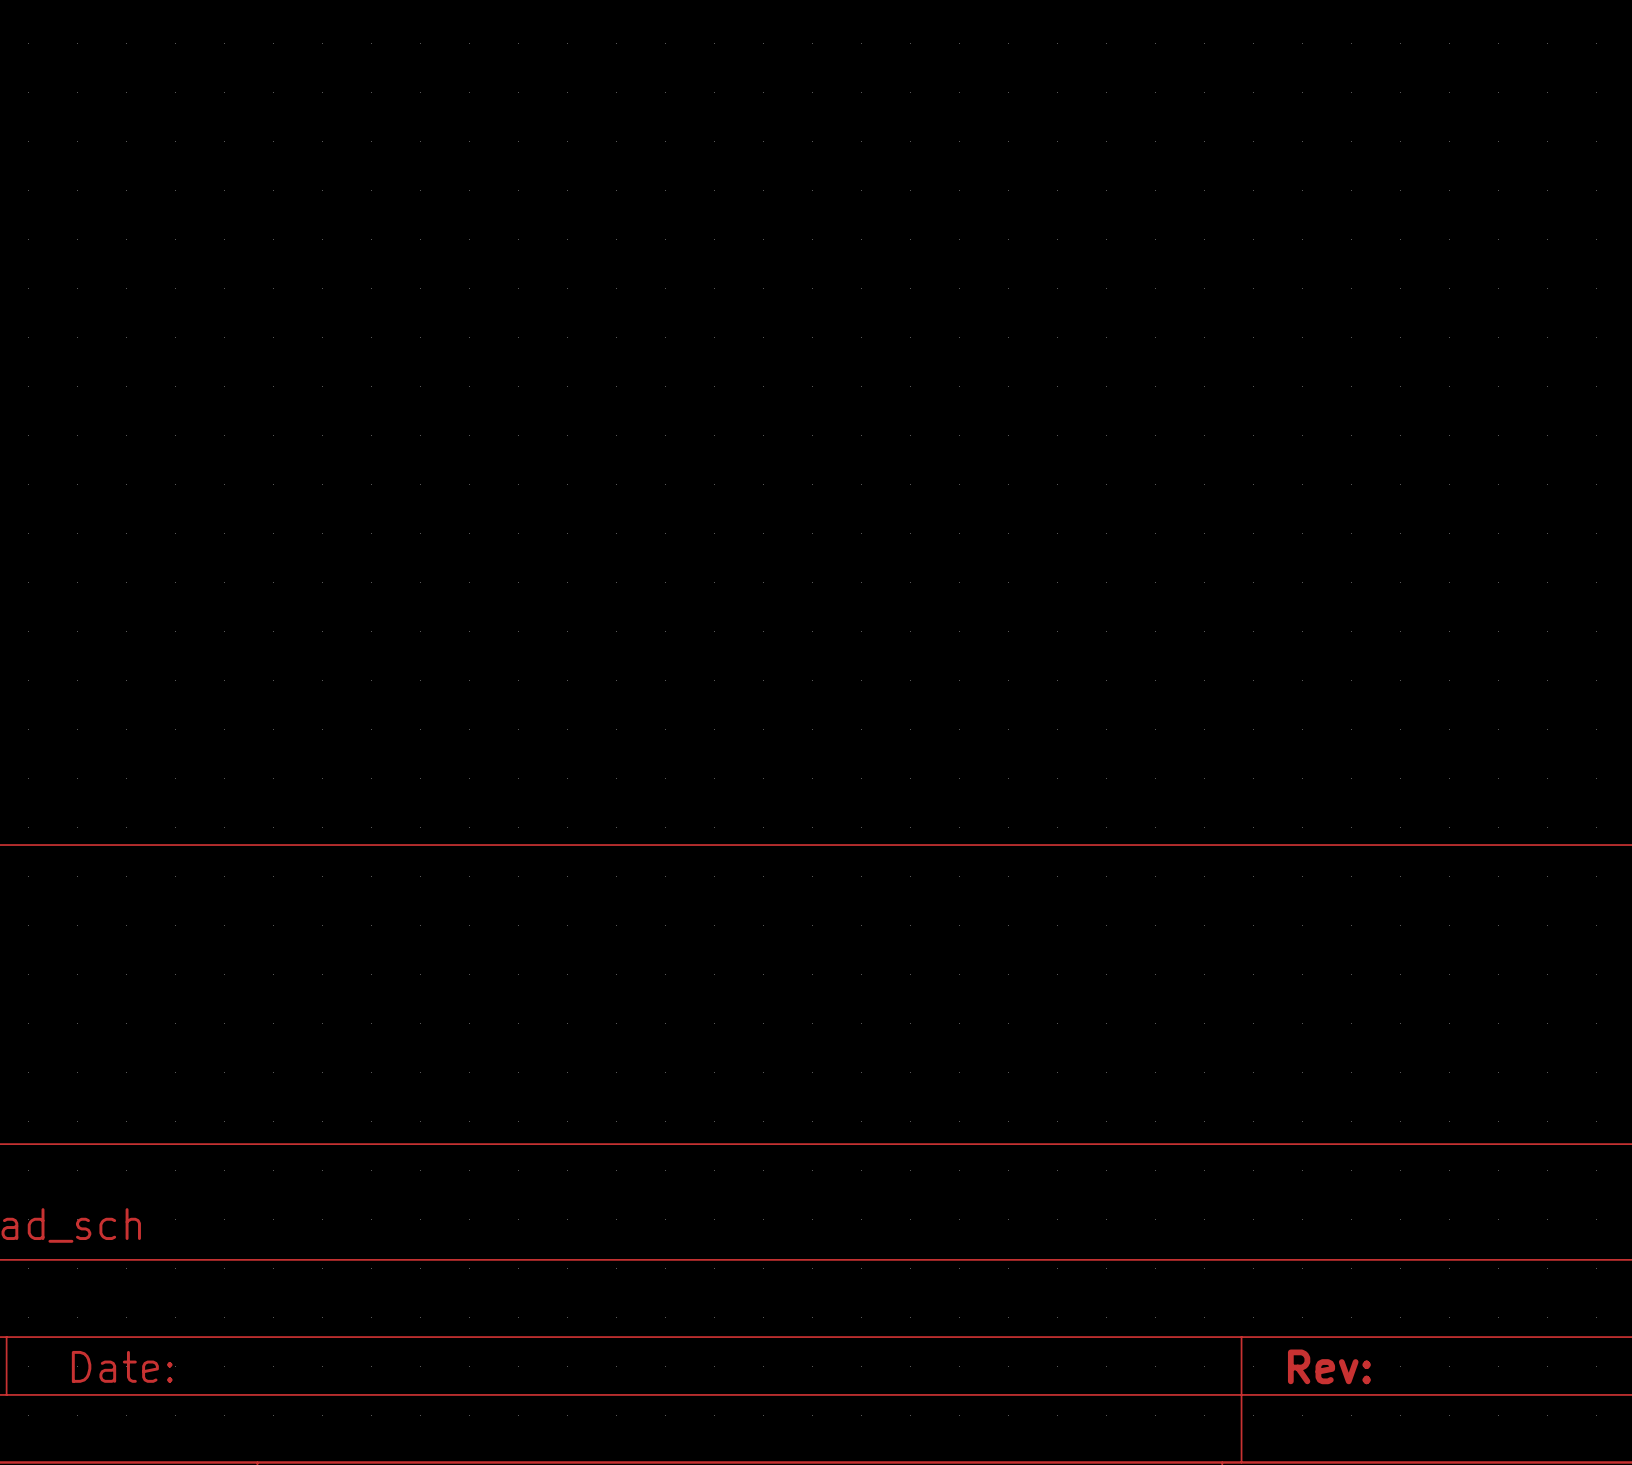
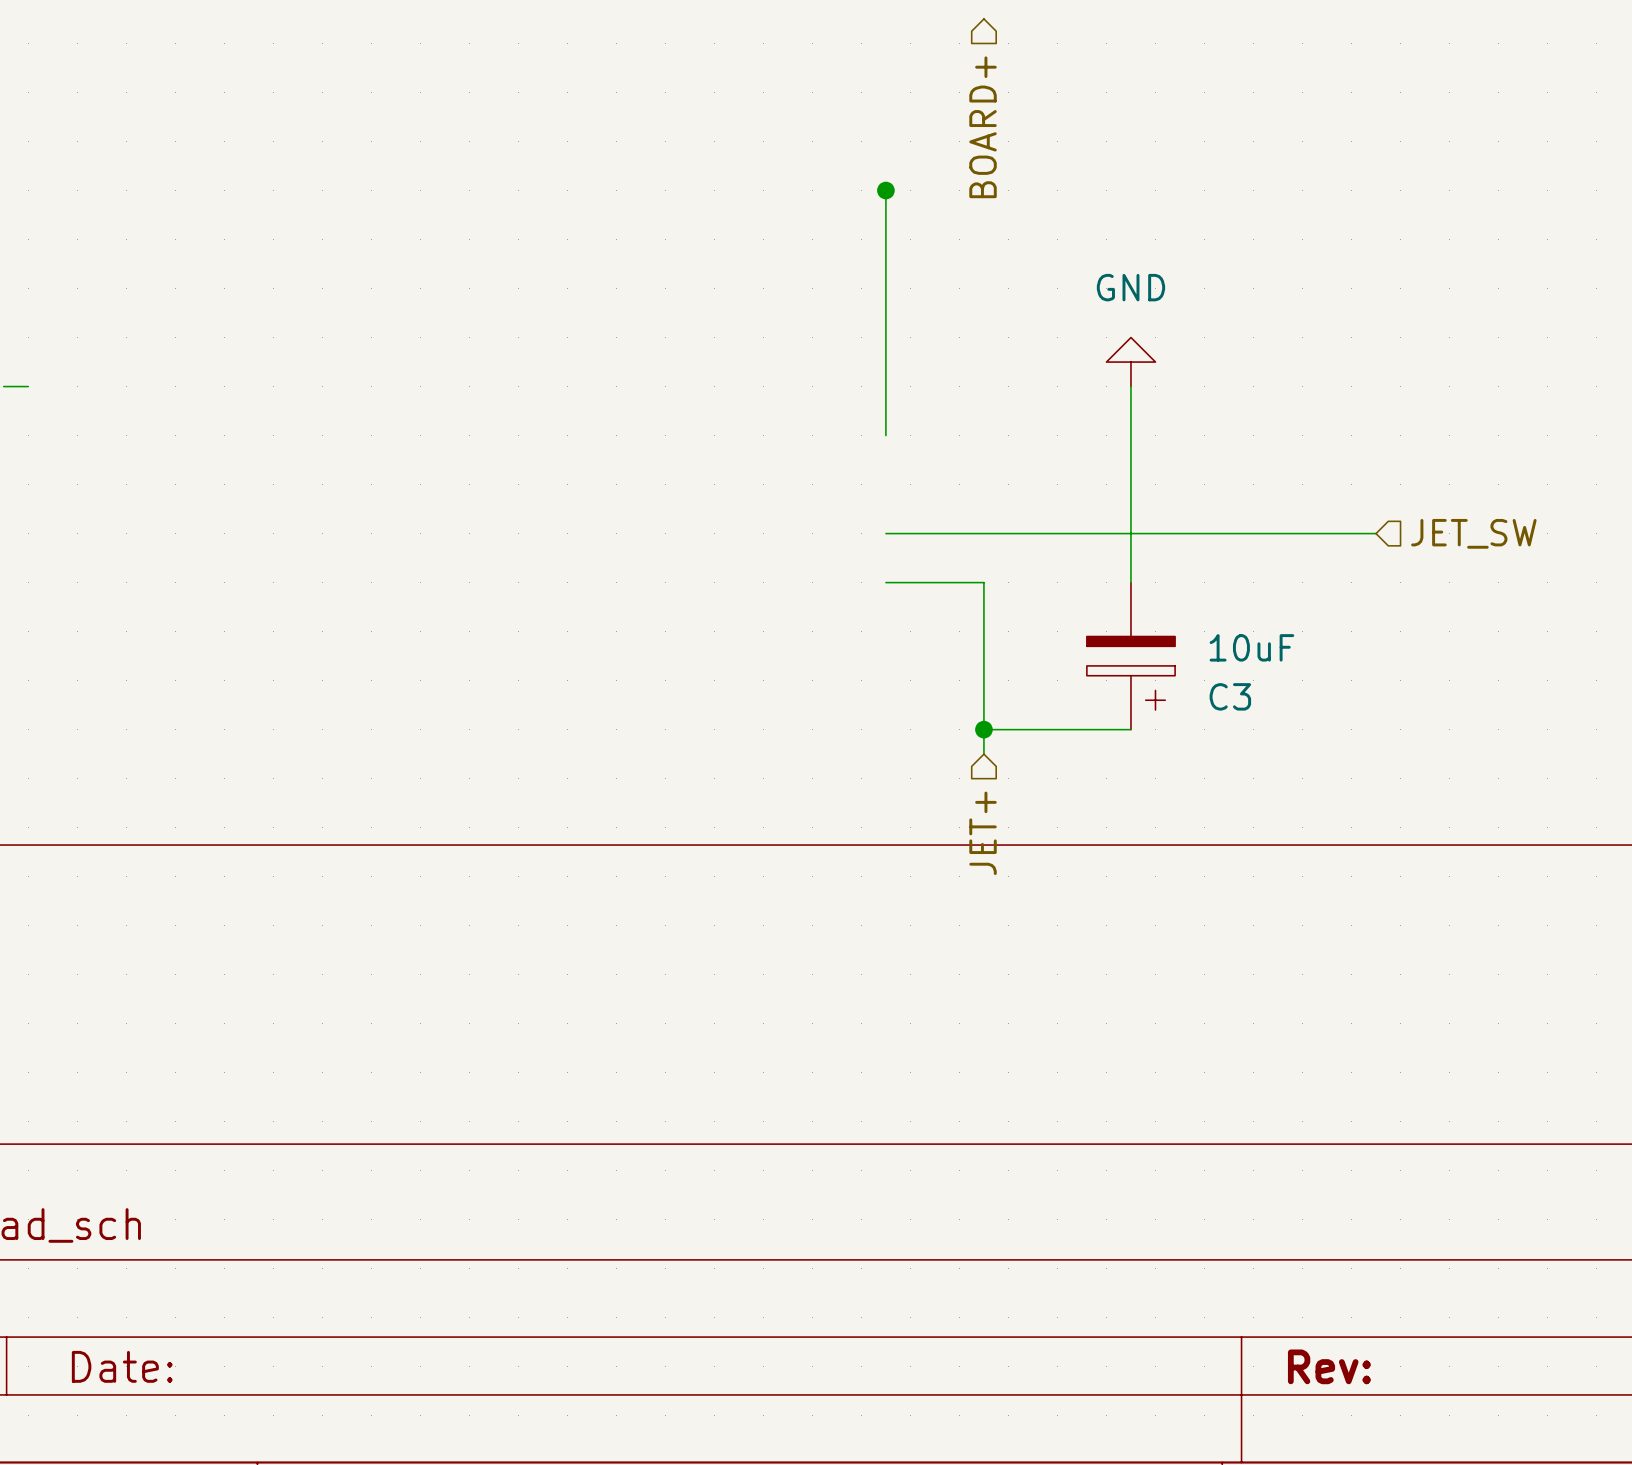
hierarchical label: none -> BOARD+ (983, 127)
wire: none -> (885, 190) (885, 435)
junction: none -> (885, 190)
power symbol: none -> GND (1130, 362)
wire: none -> (3, 386) (28, 386)
wire: none -> (1130, 386) (1130, 582)
wire: none -> (885, 533) (1376, 533)
hierarchical label: none -> JET_SW (1473, 533)
wire: none -> (885, 582) (983, 582) (983, 754)
C3: none -> 10uF (1130, 656)
wire: none -> (983, 729) (1130, 729)
junction: none -> (983, 729)
hierarchical label: none -> JET+ (983, 833)

